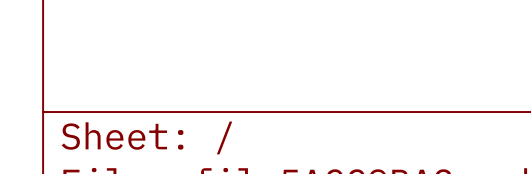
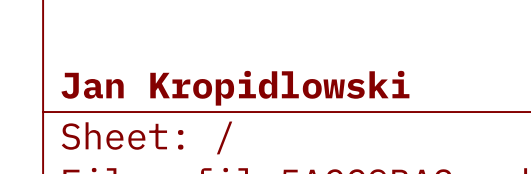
title block: none -> Jan Kropidlowski (235, 88)

